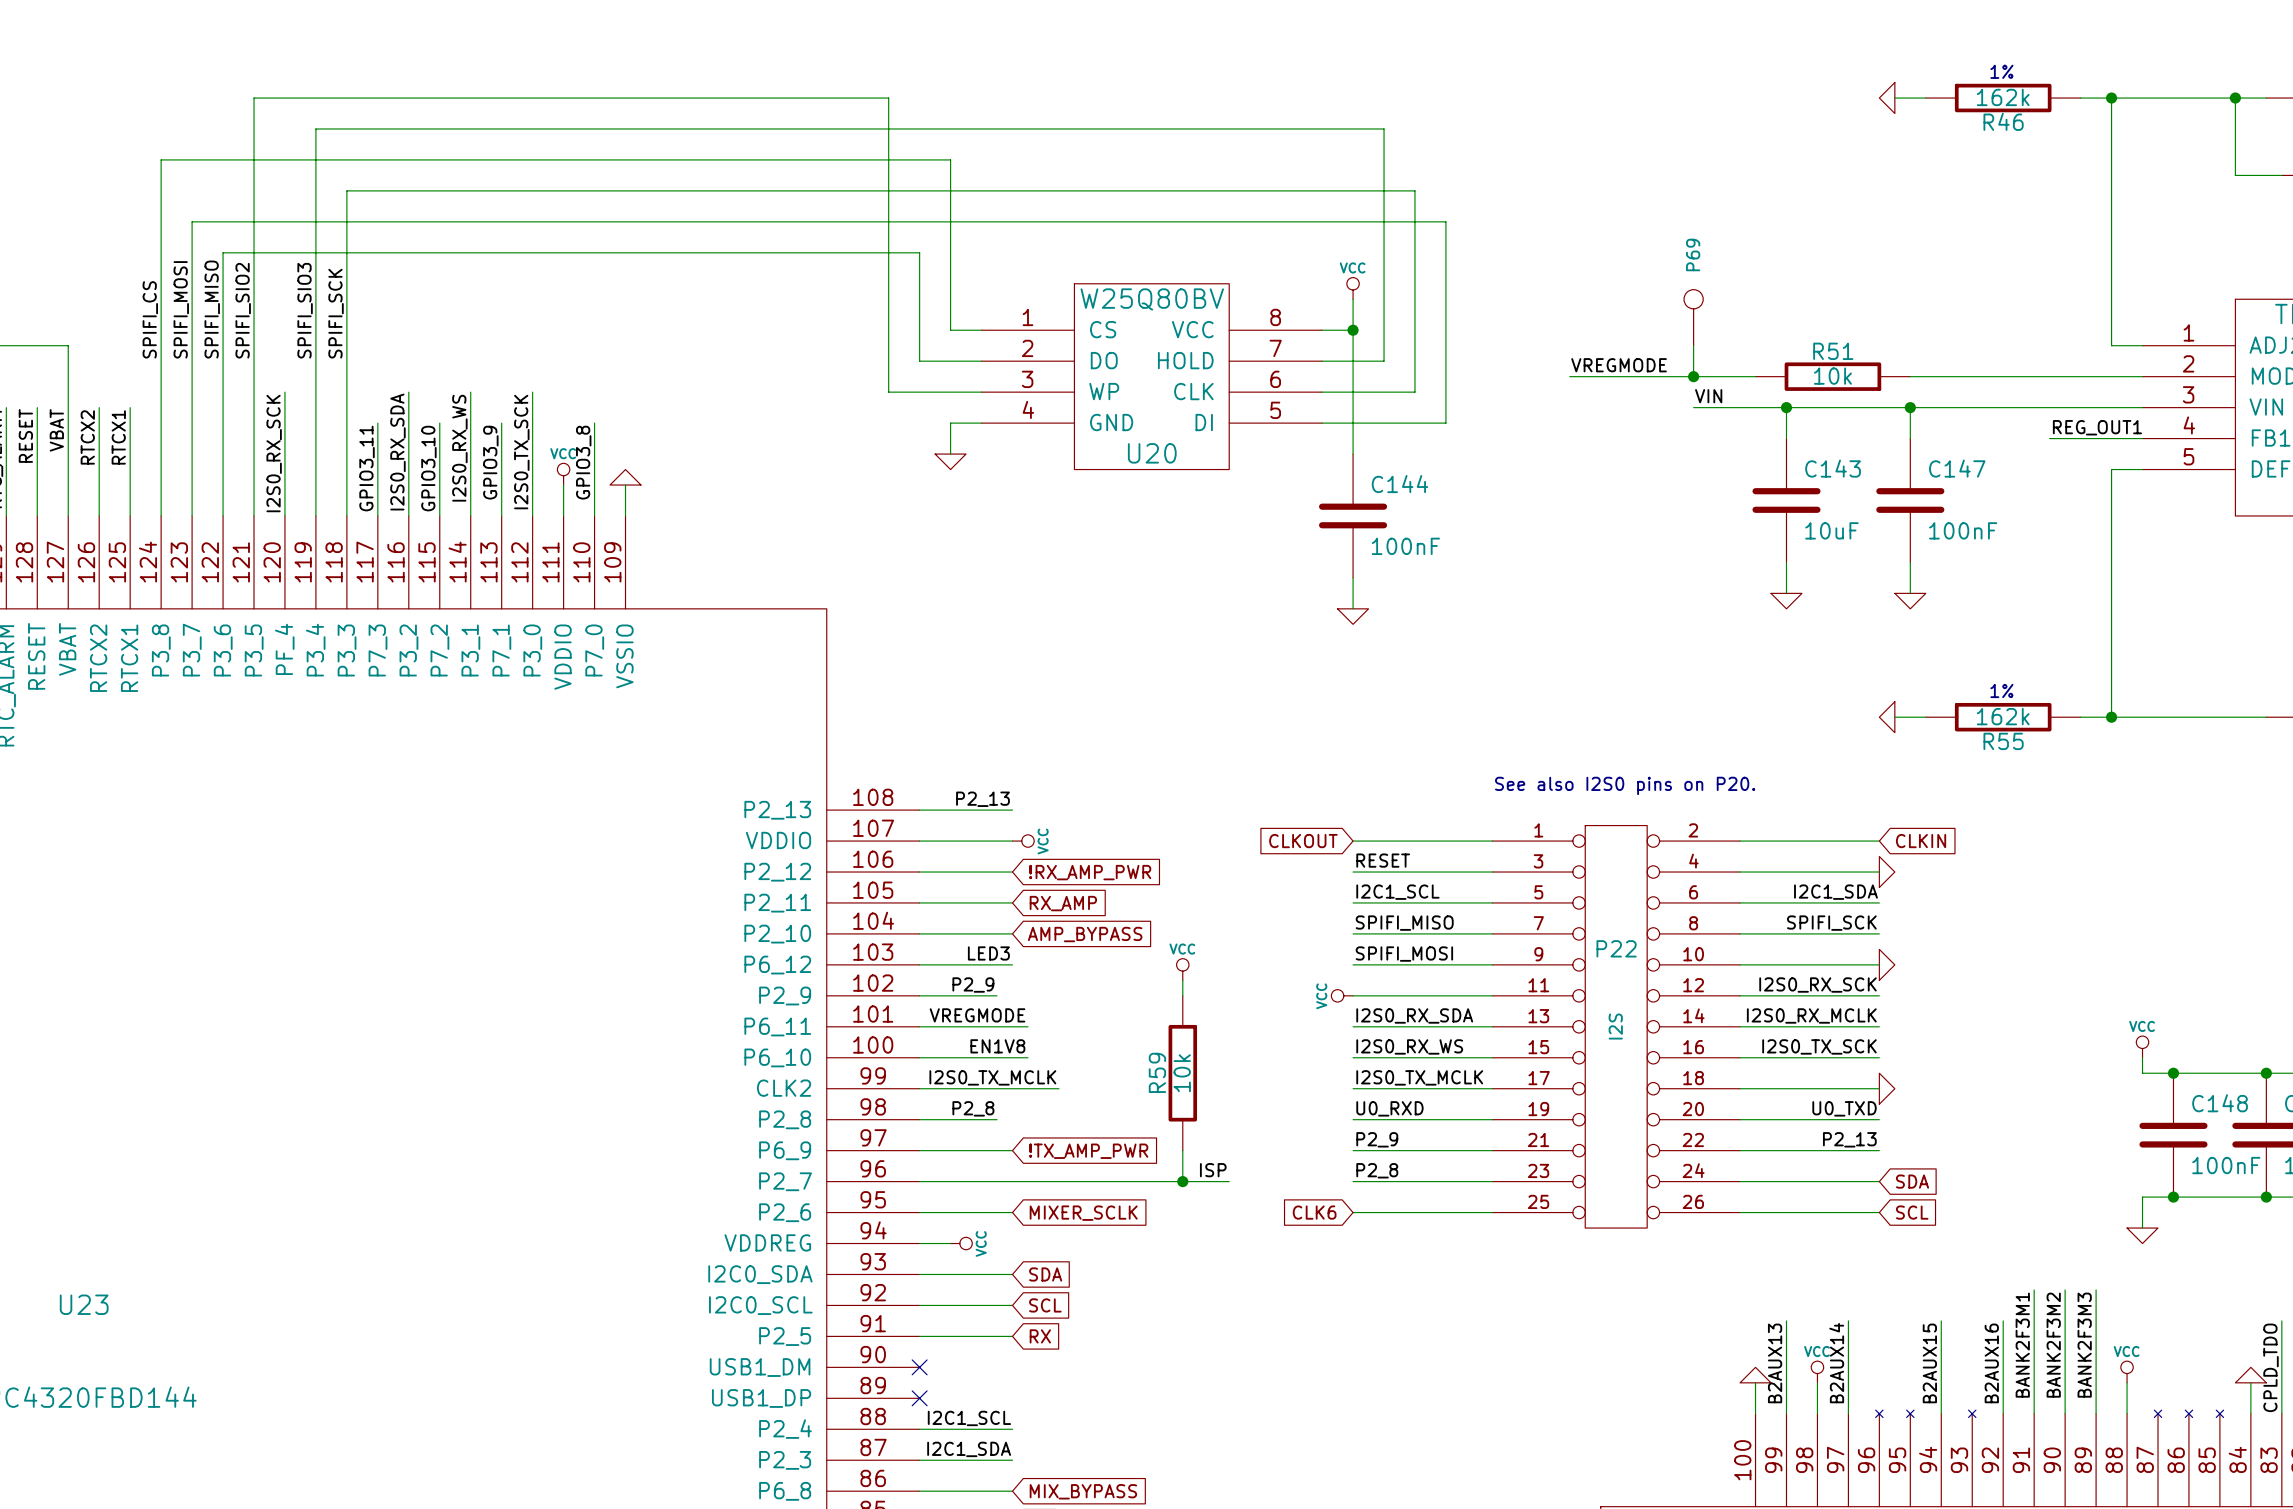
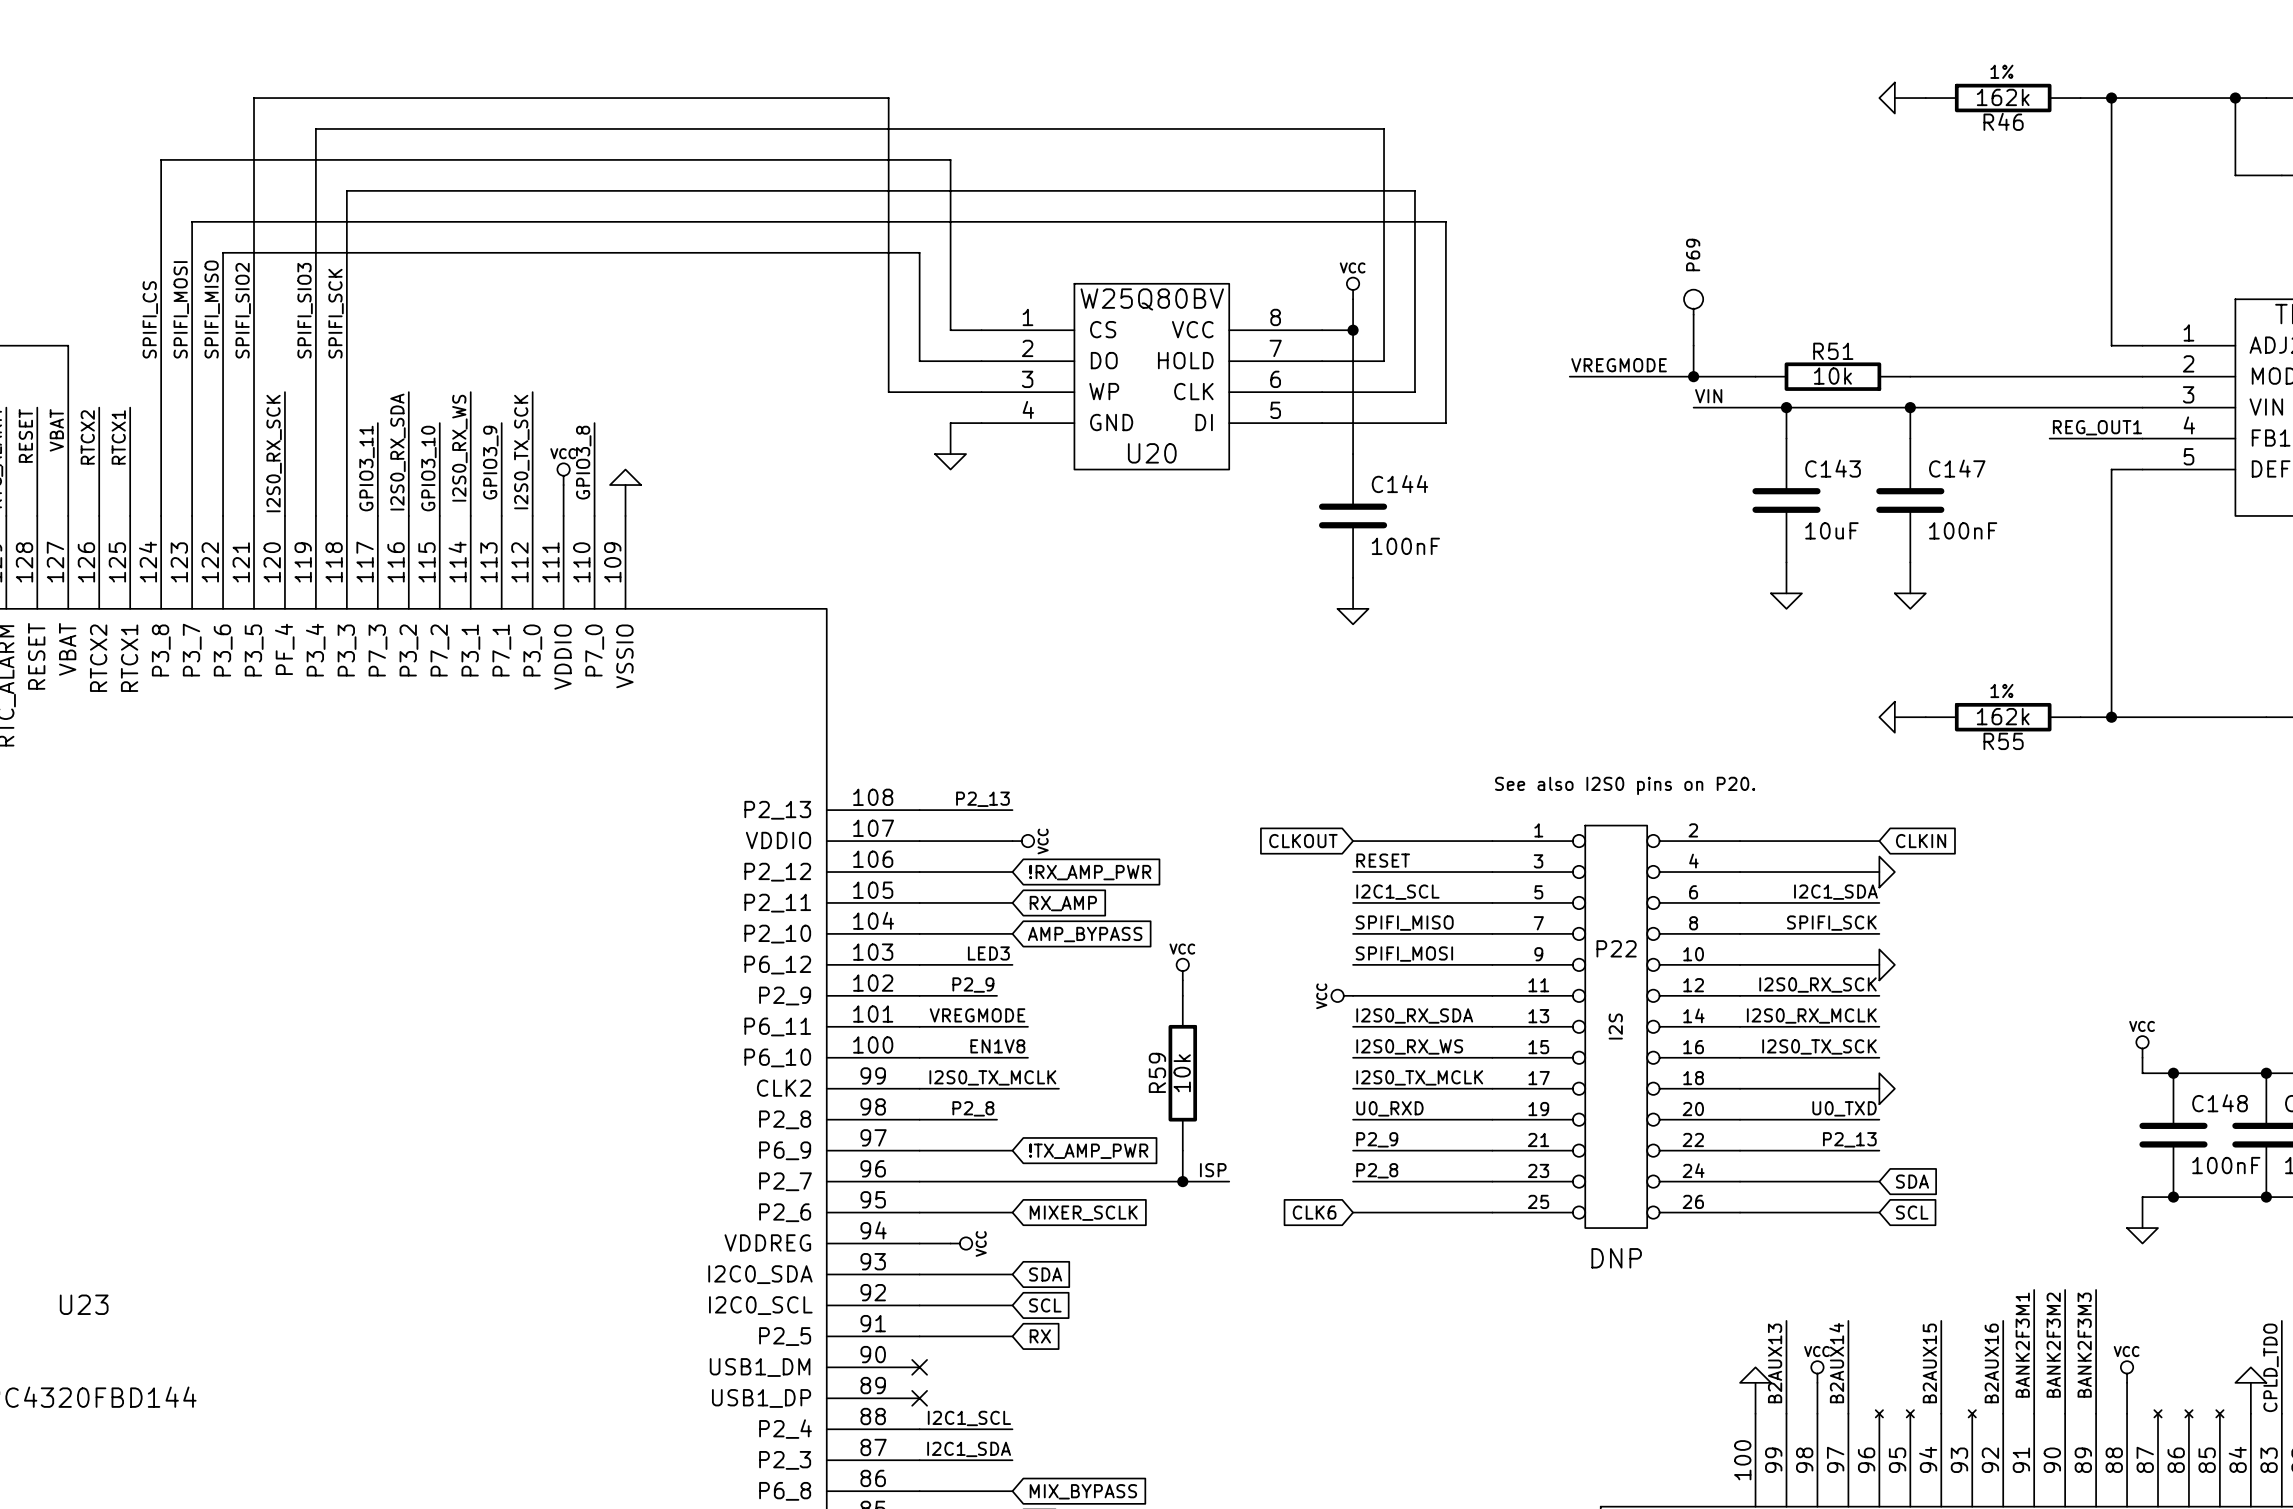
P22 text: none -> DNP (1616, 1258)

